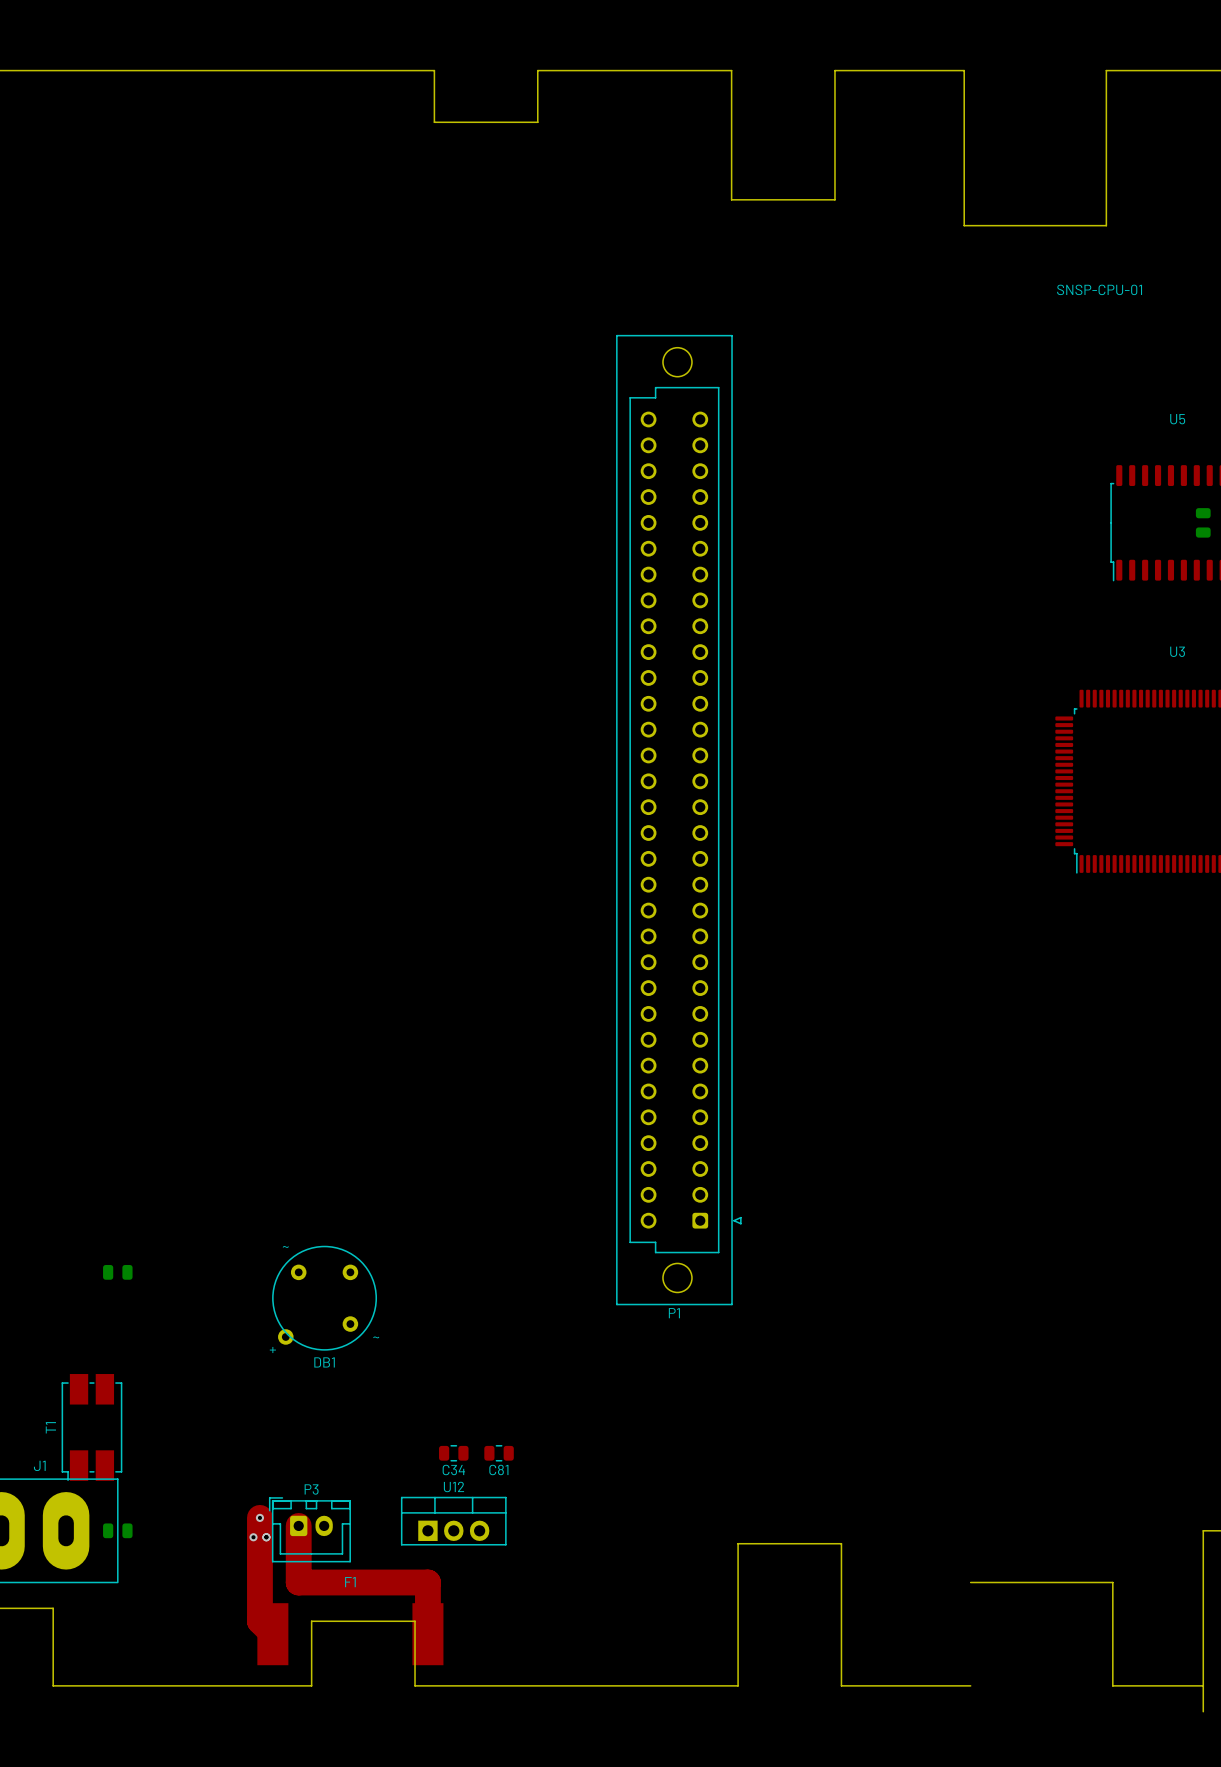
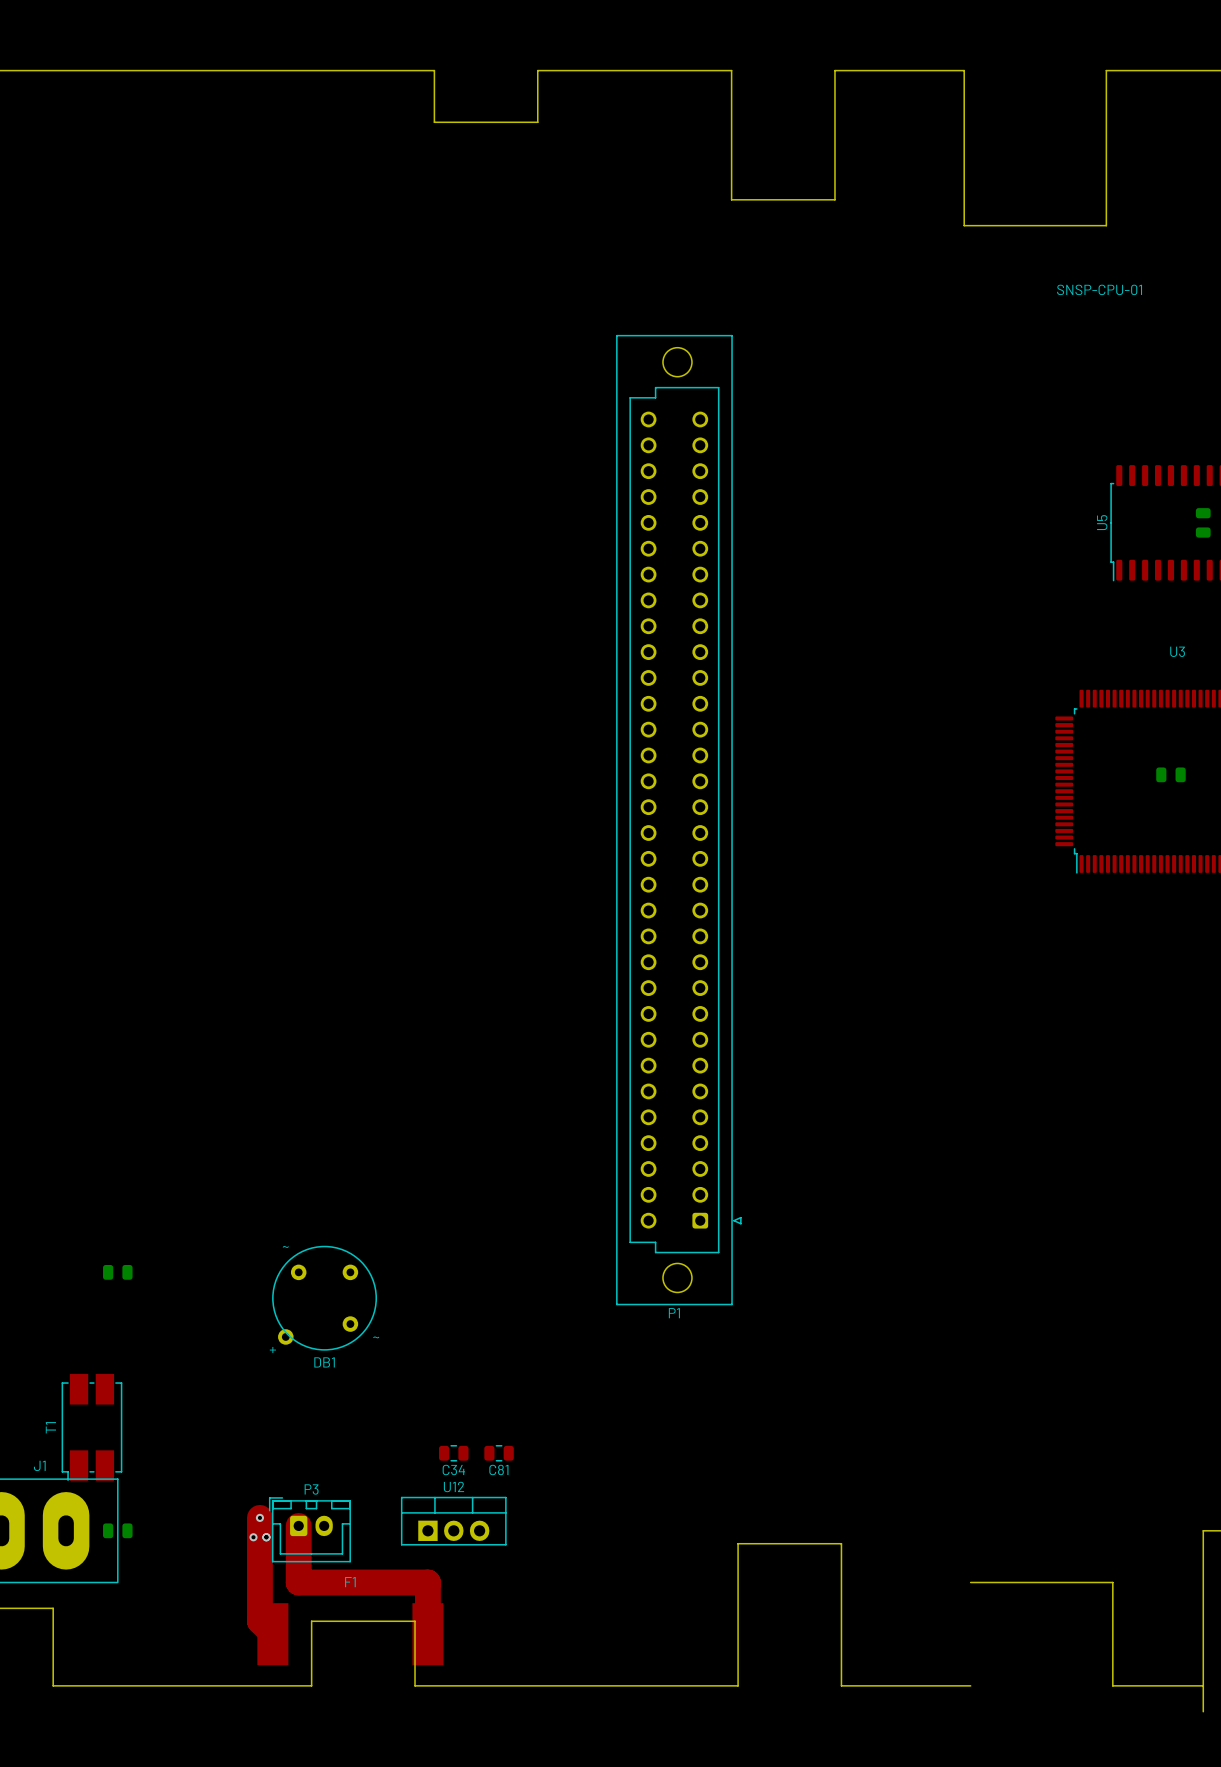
U5 name rotation: 0° (1177, 419) -> 90° counterclockwise (1102, 522)
U5 name position: U5 (1177, 419) -> U5 (1102, 522)
part: none -> (1170, 774)

